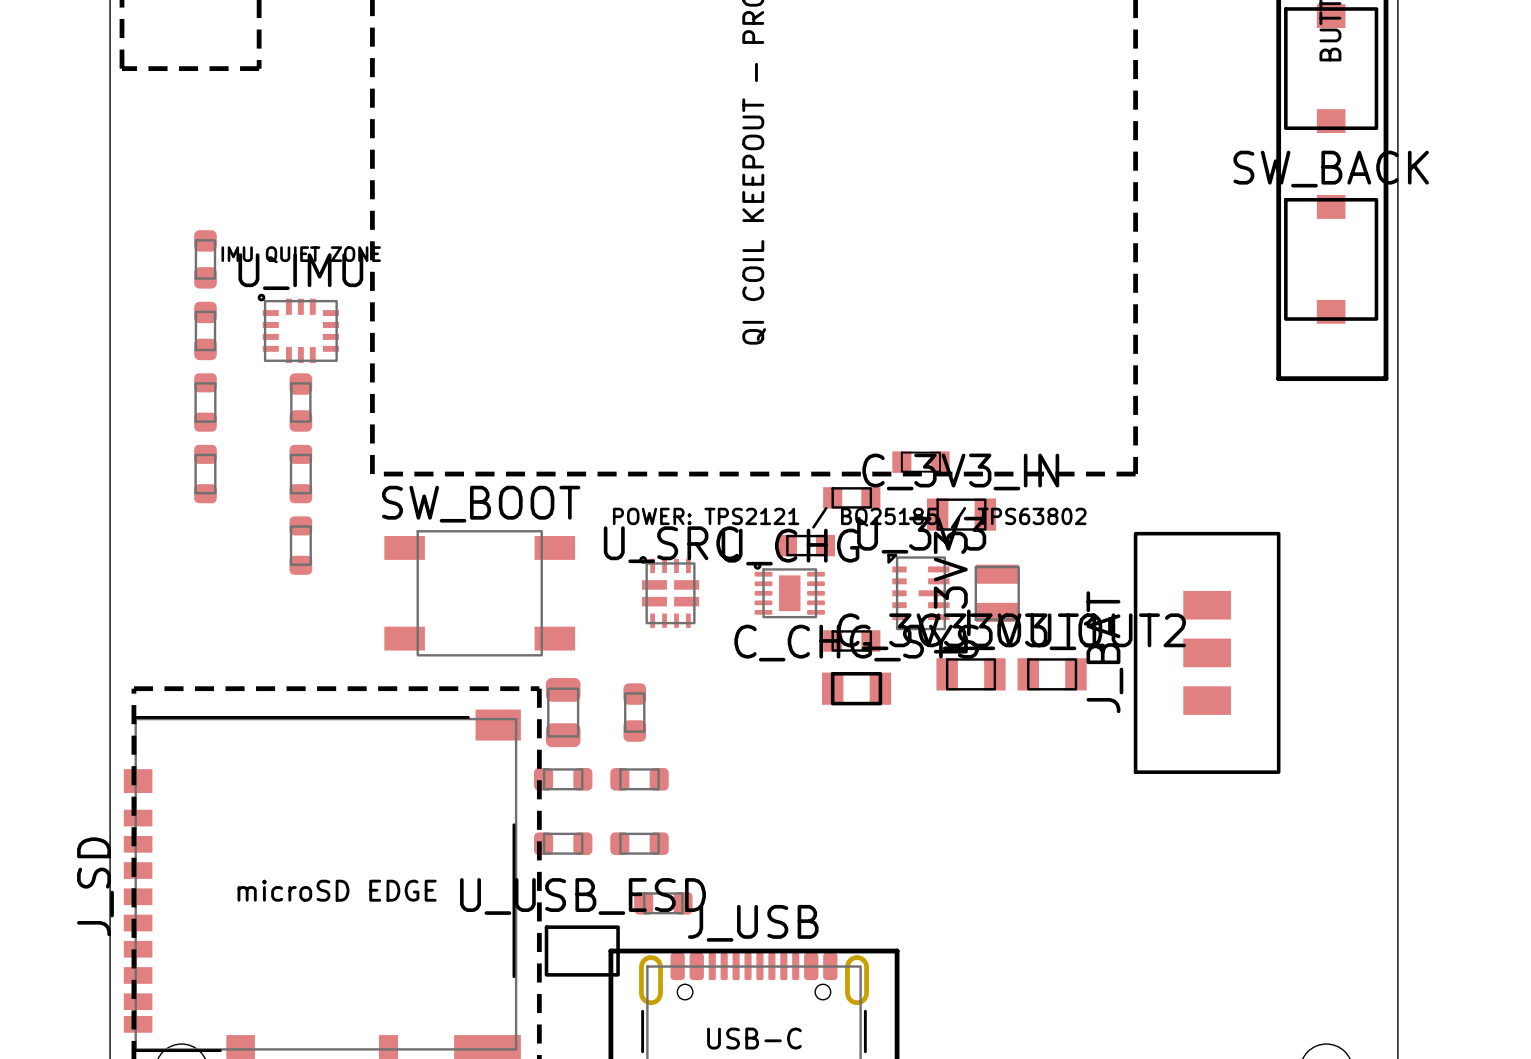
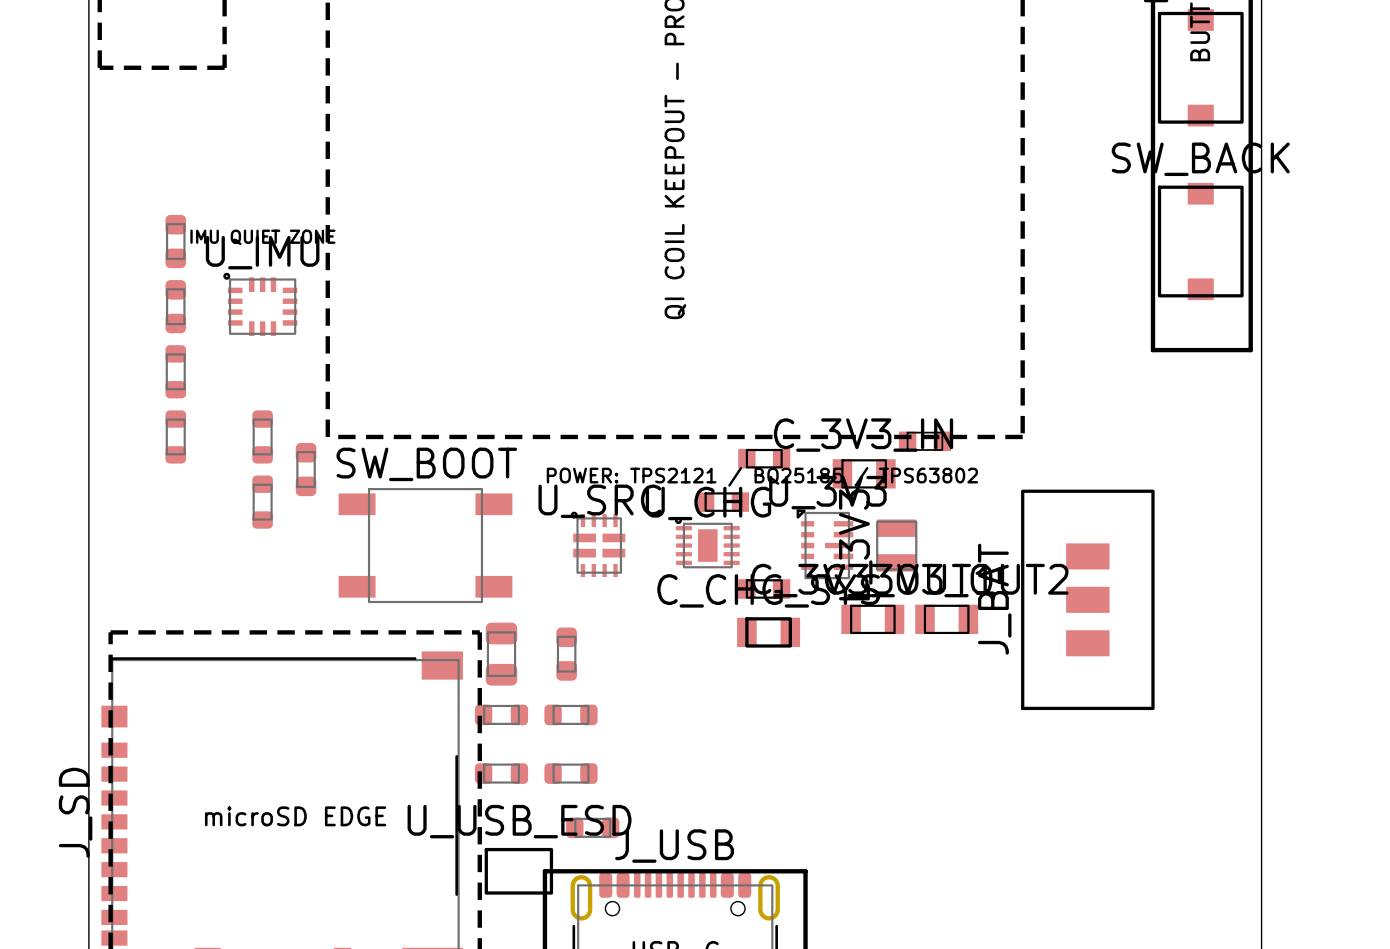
part position: (300, 402) -> (306, 469)
part position: (920, 462) -> (924, 441)

